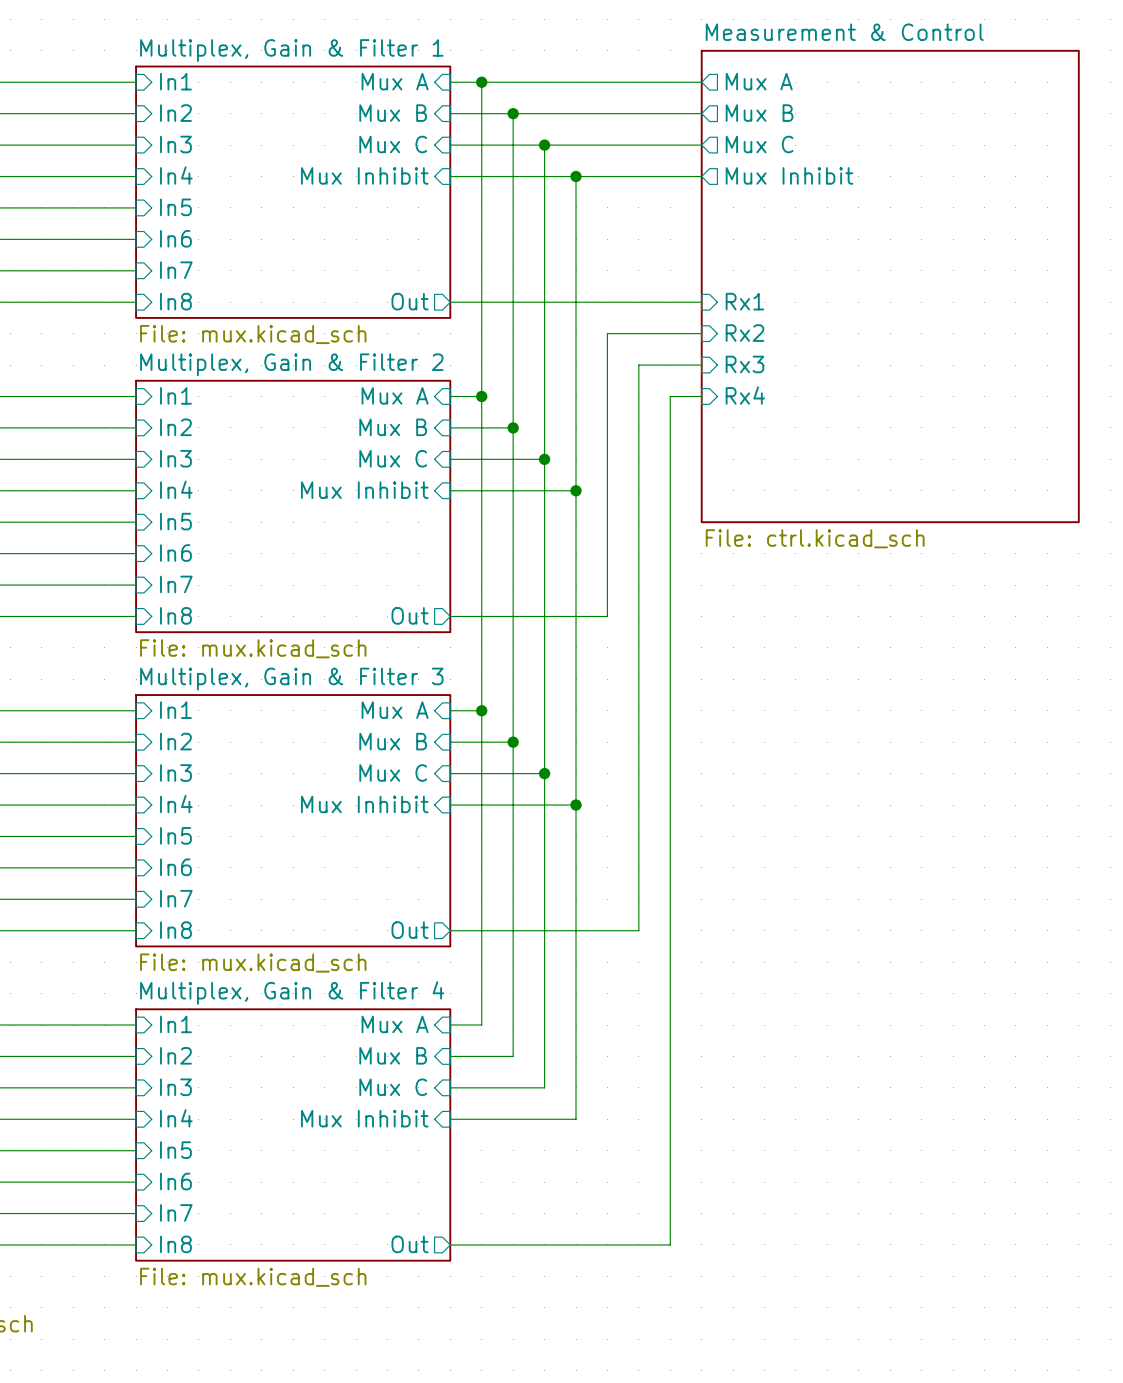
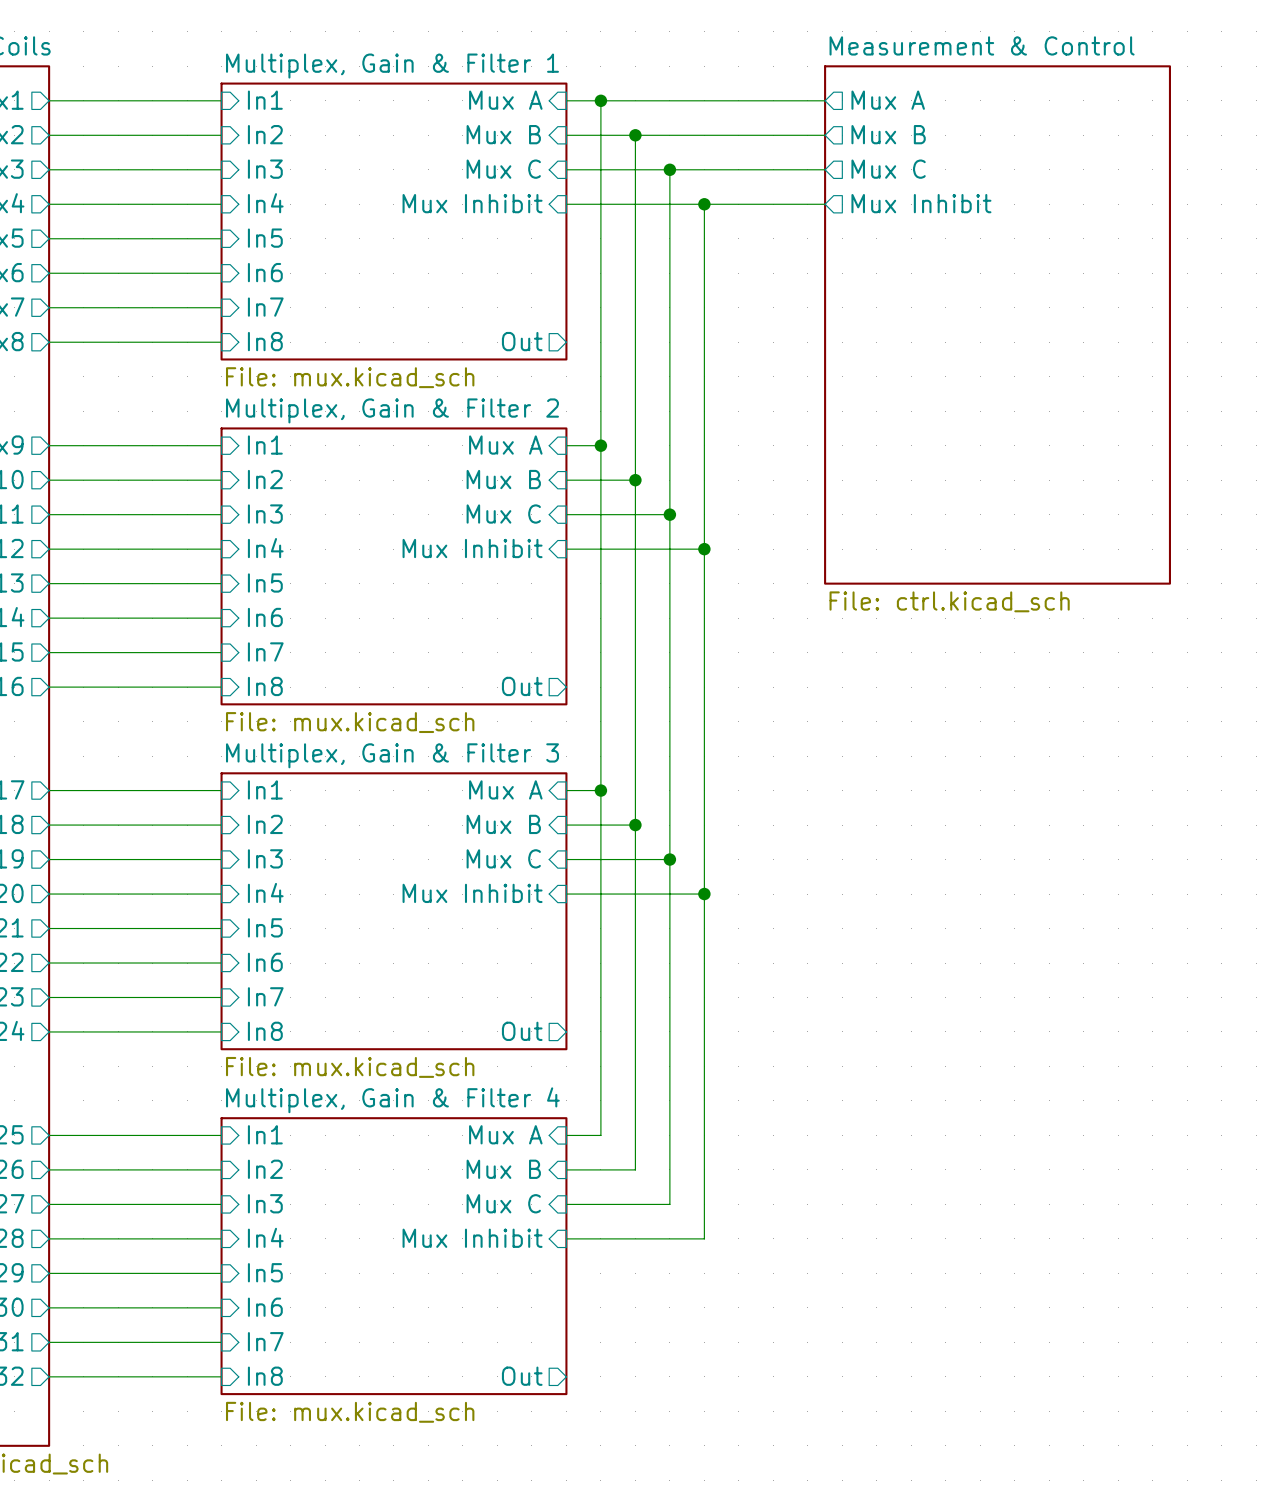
sheet pin position: Mux A (759, 81) -> Mux A (888, 100)
wire: (685, 82) (701, 82) -> none
wire: (685, 113) (701, 113) -> none
sheet pin position: Mux B (759, 113) -> Mux B (888, 134)
sheet pin position: Mux C (759, 144) -> Mux C (888, 169)
wire: (685, 145) (701, 145) -> none
sheet pin position: Mux Inhibit (789, 175) -> Mux Inhibit (921, 203)
wire: (685, 176) (701, 176) -> none
sheet Measurement & Control: none -> File: ctrl.kicad_sch (997, 324)
sheet Measurement & Control: File: ctrl.kicad_sch (890, 286) -> none
sheet pin: Rx1 (744, 301) -> none
wire: (450, 302) (701, 302) -> none
wire: (701, 333) (607, 333) (607, 616) (450, 616) -> none
sheet pin: Rx2 (744, 333) -> none
sheet pin: Rx3 (744, 364) -> none
wire: (701, 365) (638, 365) (638, 930) (450, 930) -> none
sheet pin: Rx4 (745, 395) -> none
wire: (701, 396) (670, 396) (670, 1244) (450, 1244) -> none

